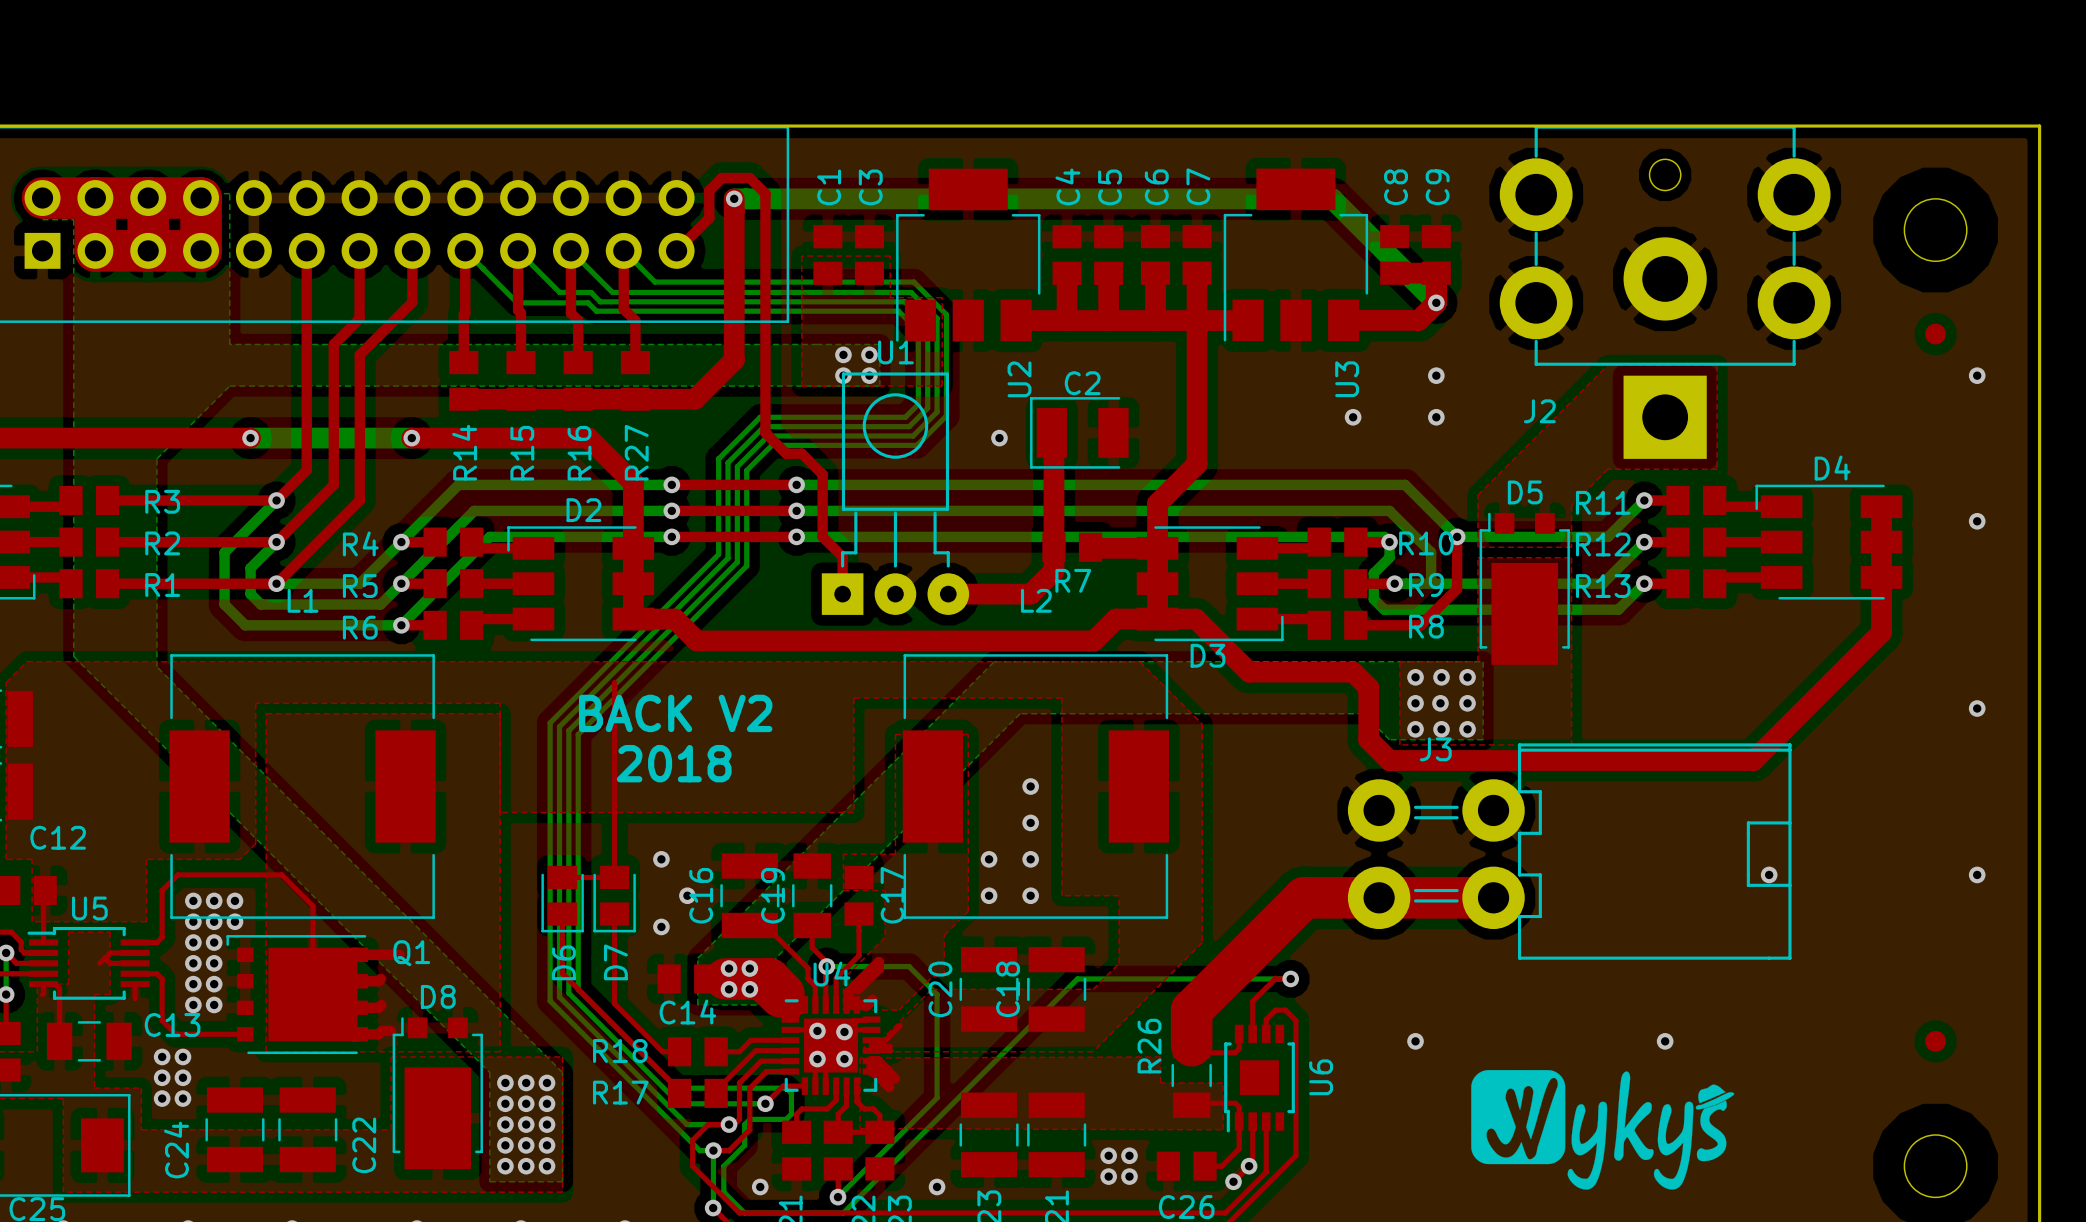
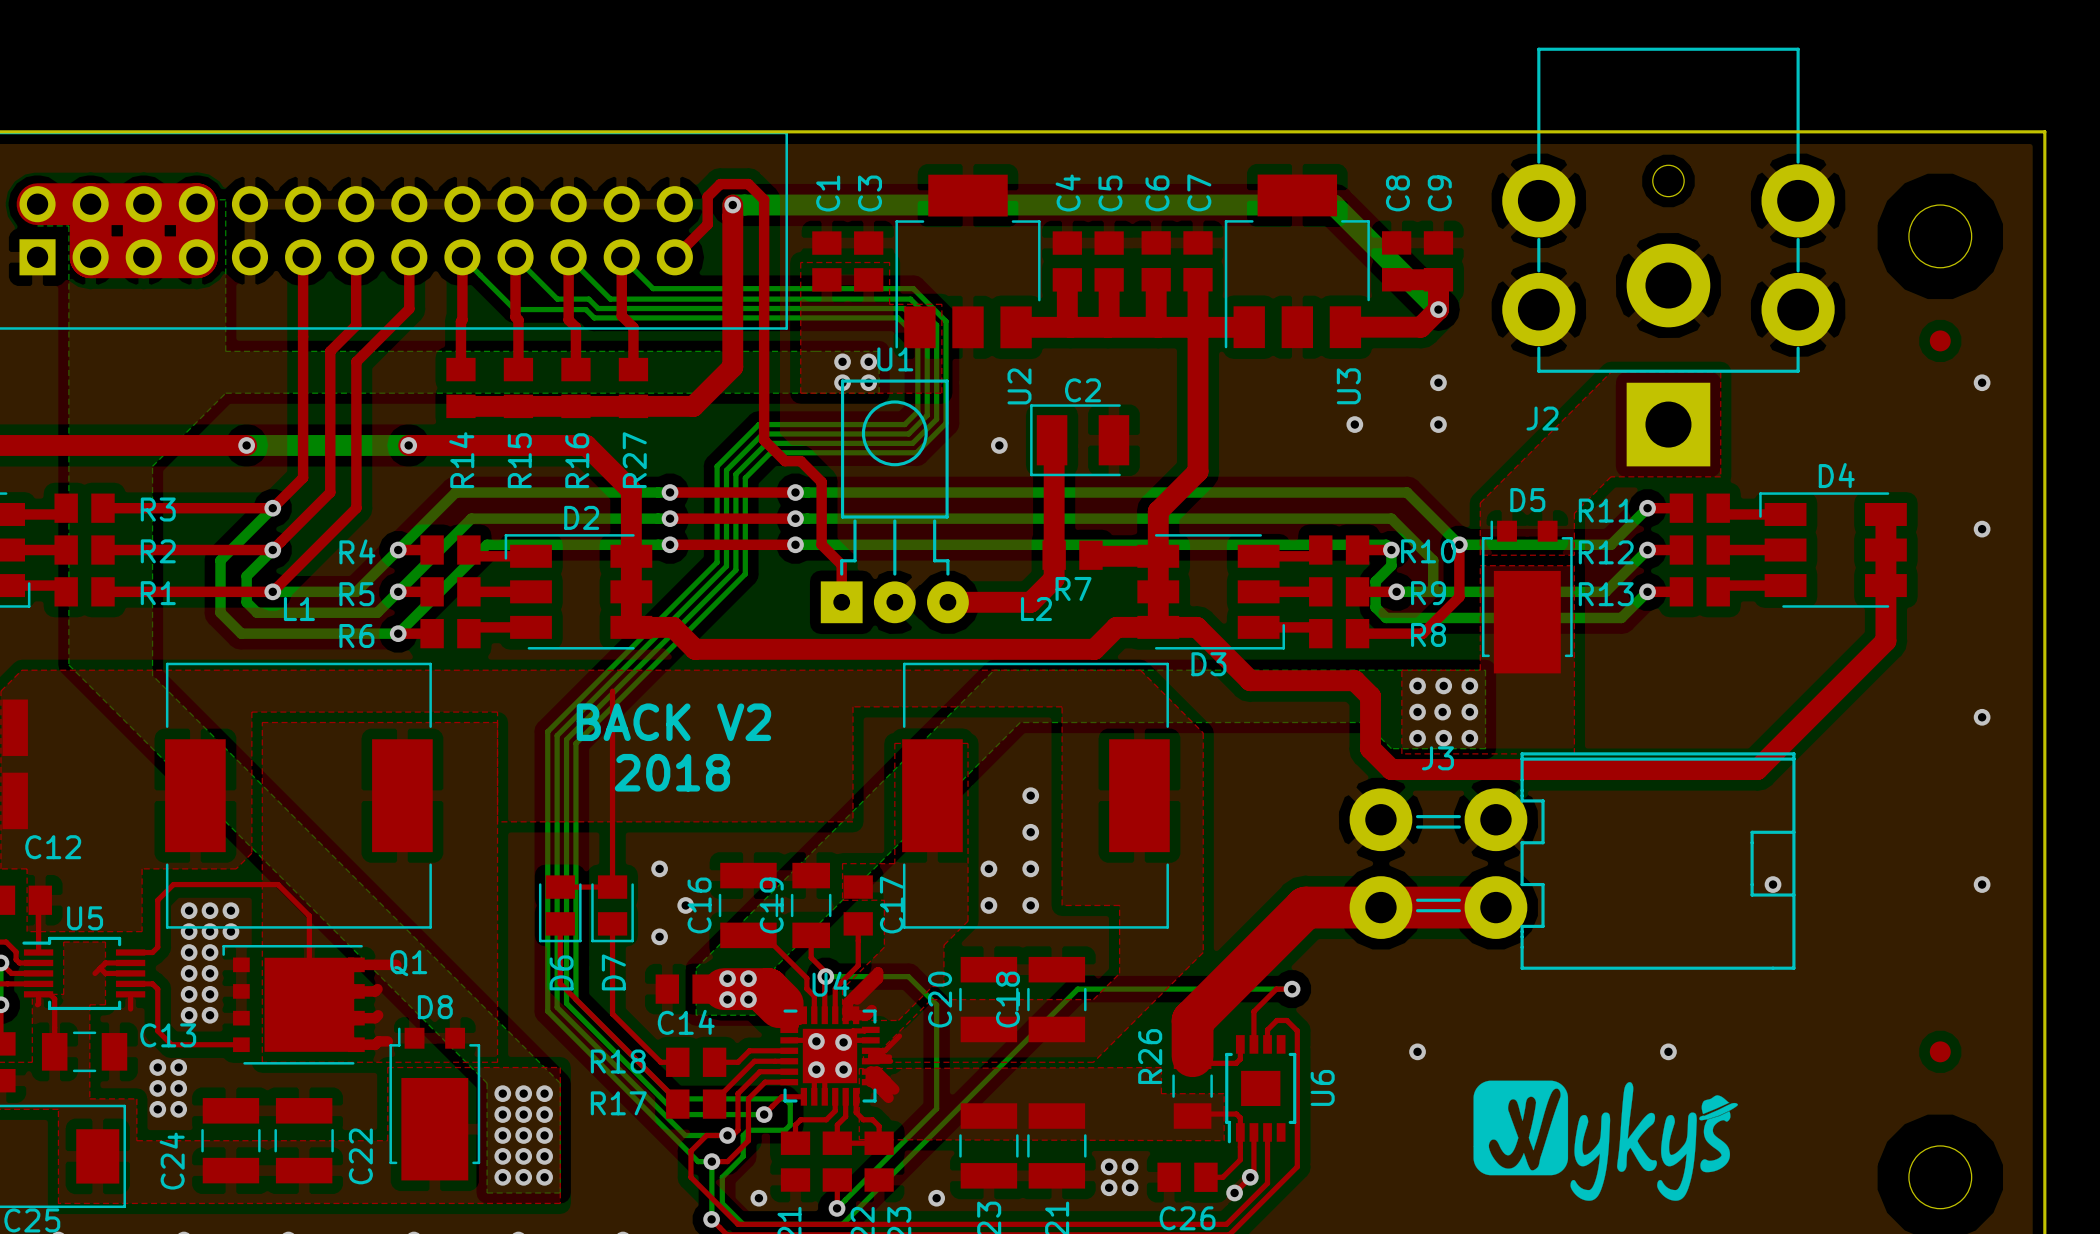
J2 footprint: [1499, 125, 1831, 459] -> [1502, 47, 1835, 467]

